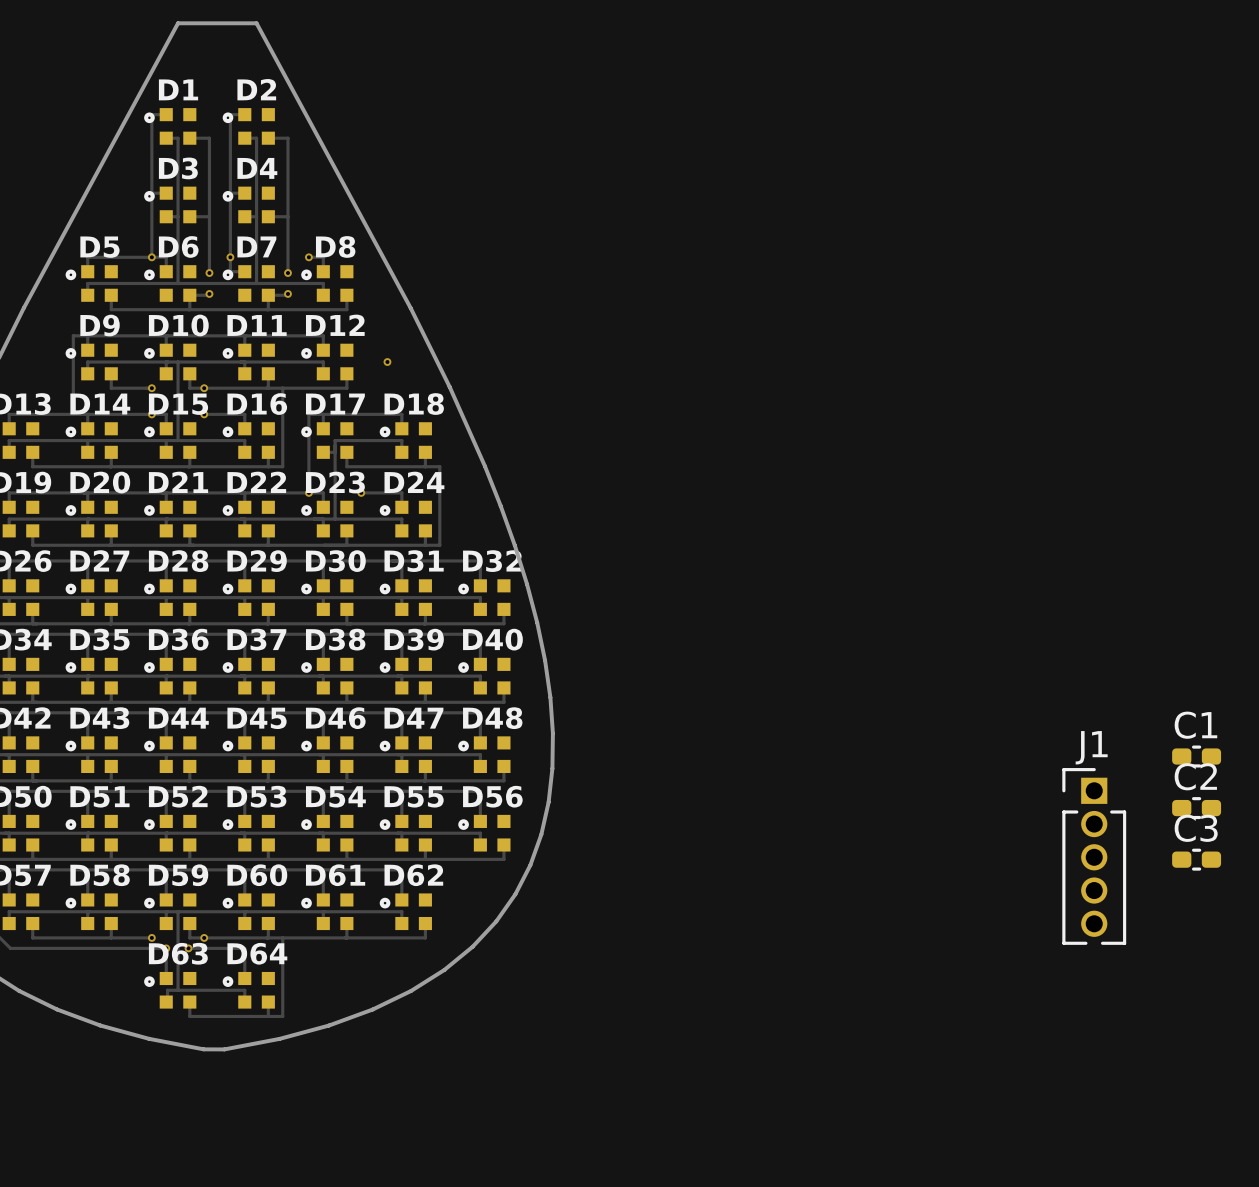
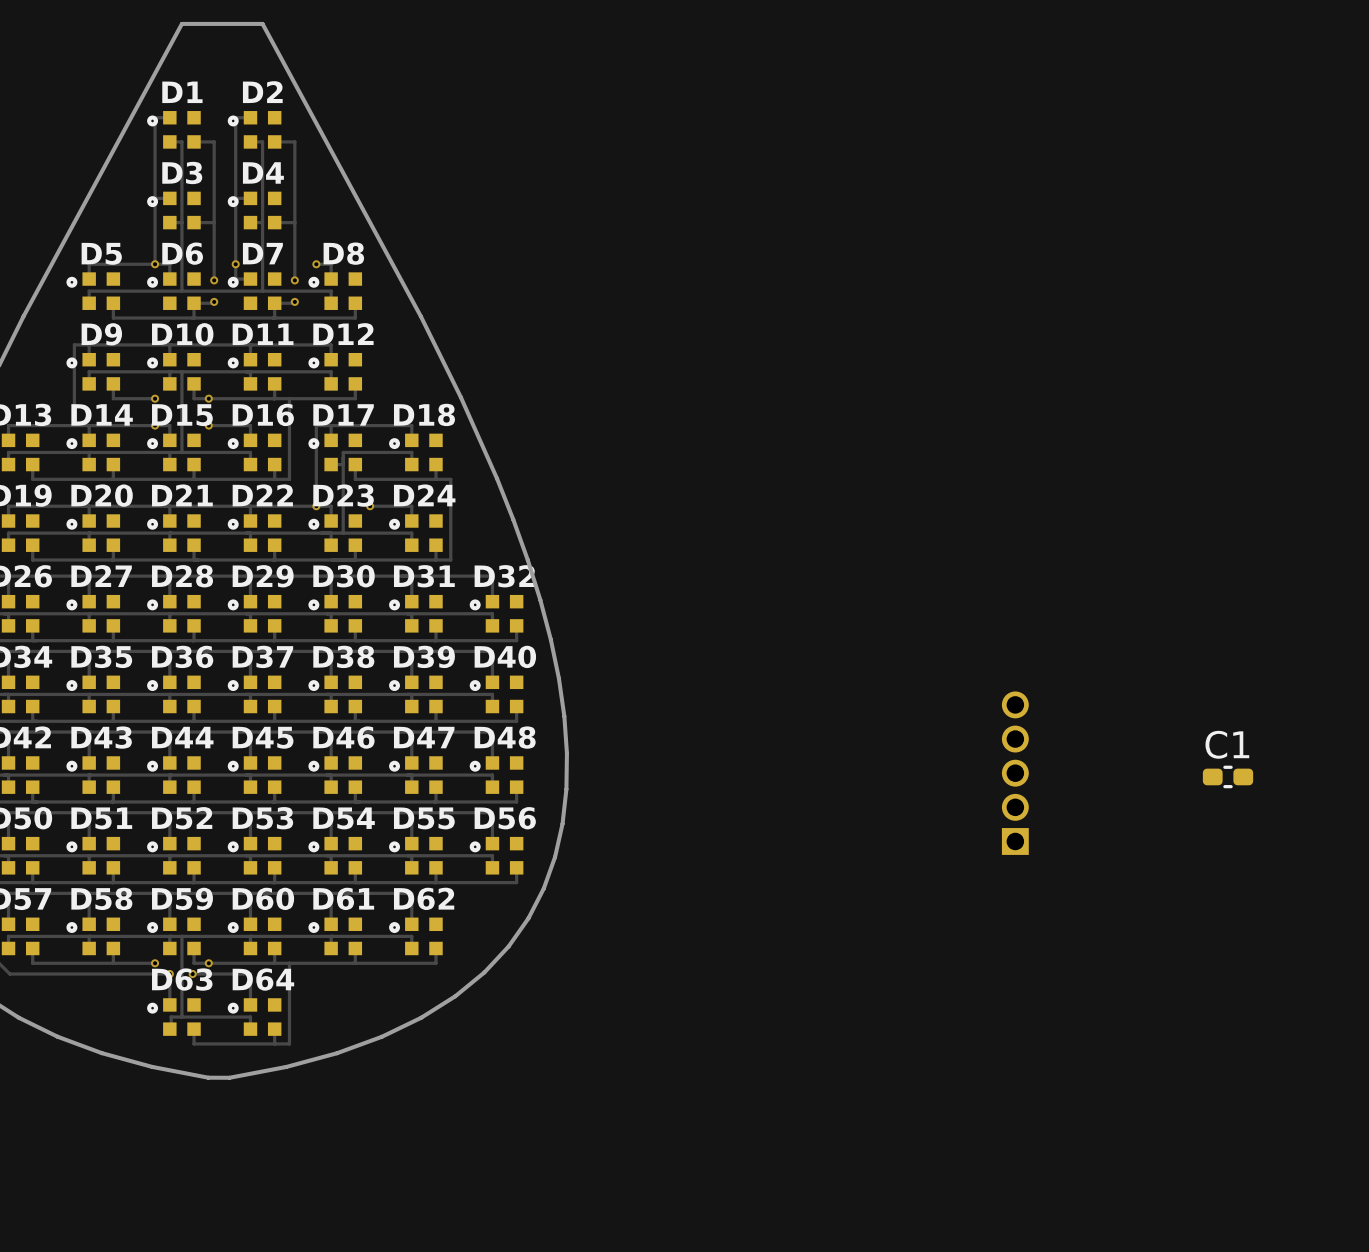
via: (387, 362) -> none
C2: (1196, 808) -> none
J1 side: top (1094, 856) -> bottom (1015, 773)
C3: (1196, 859) -> none

